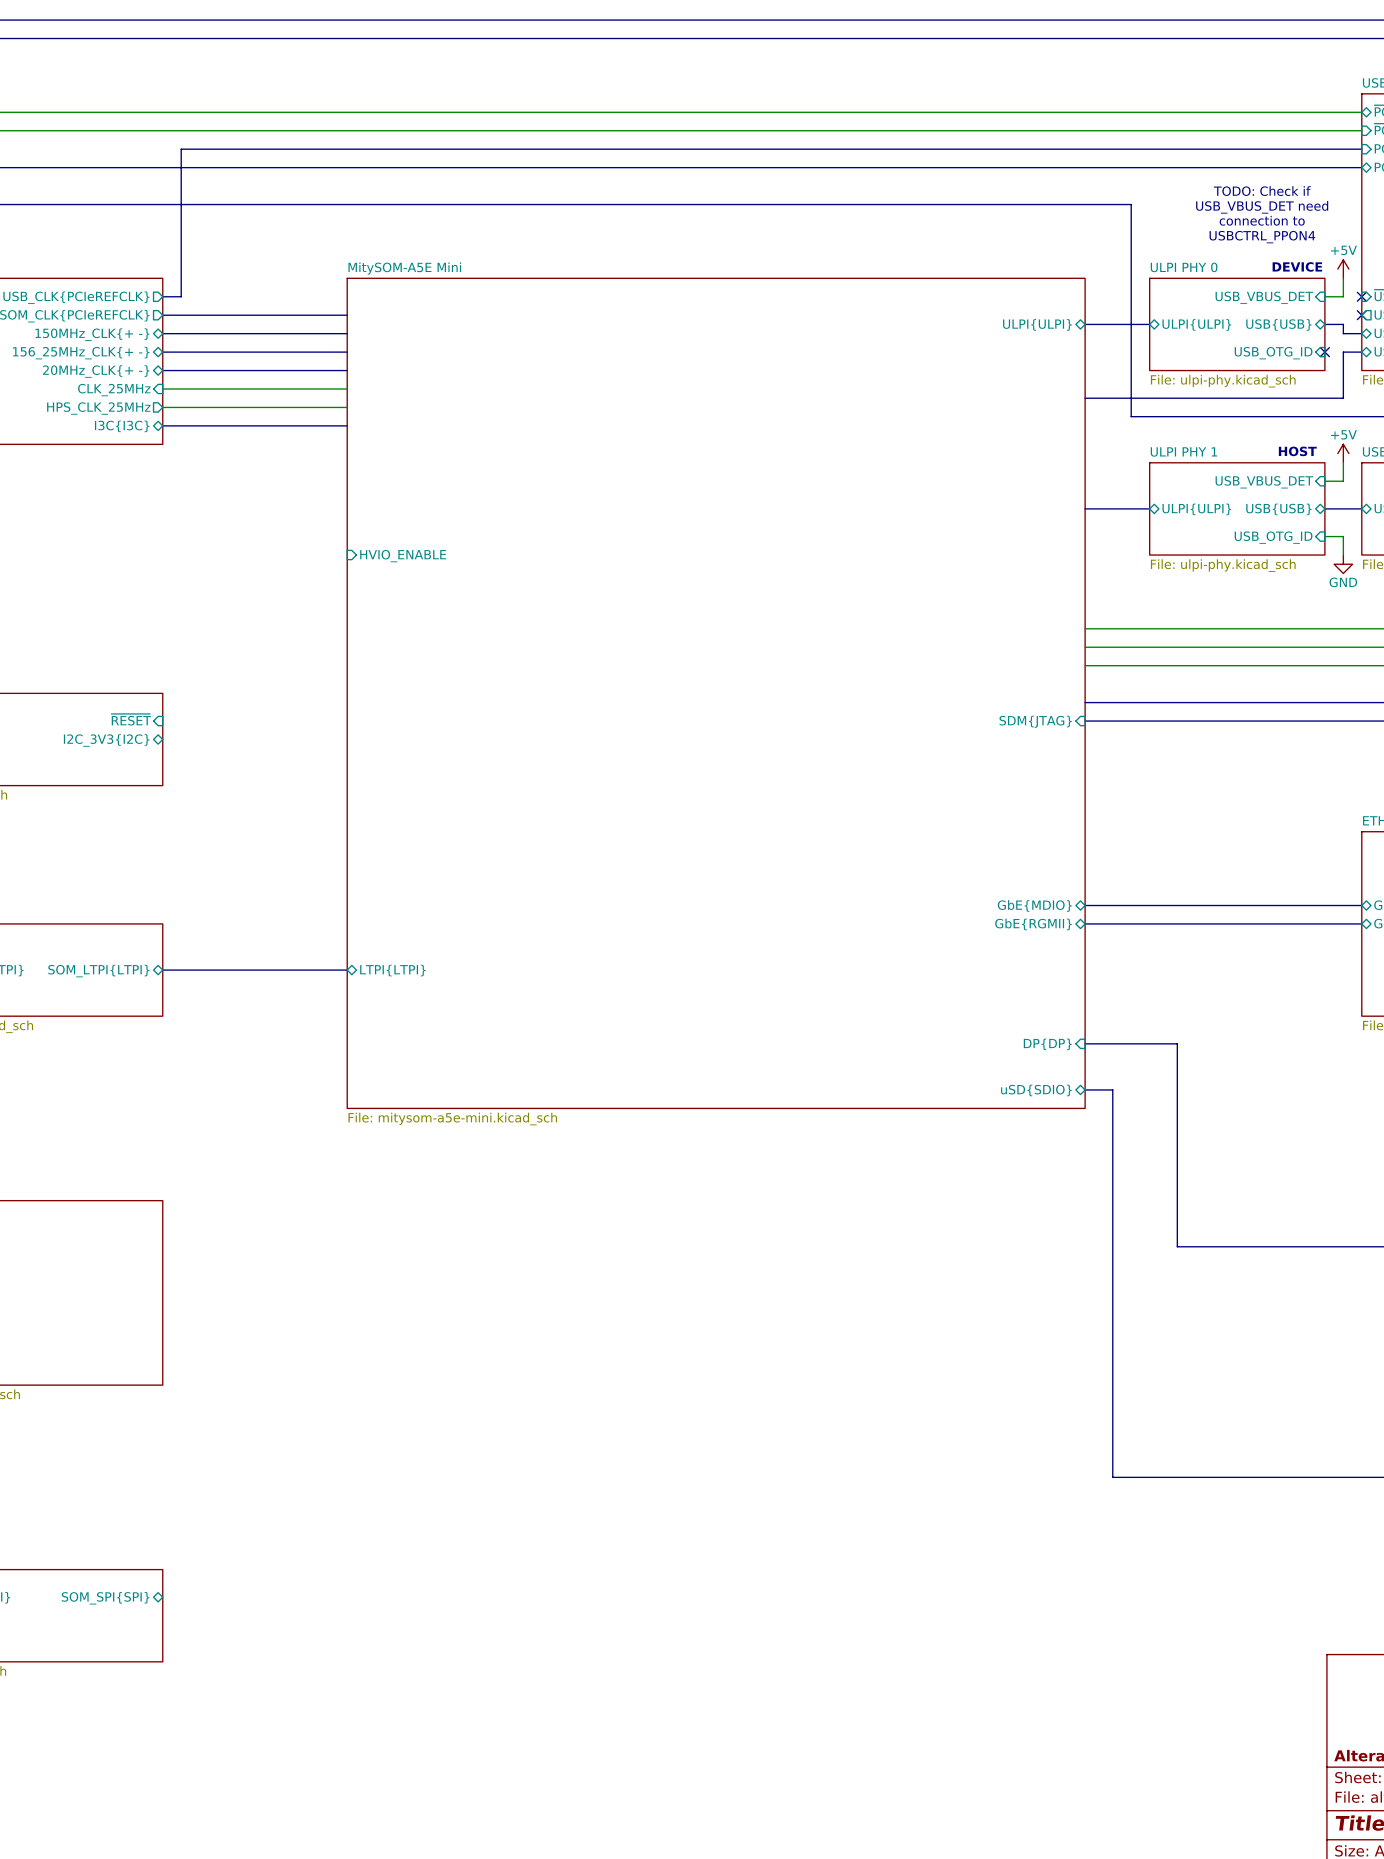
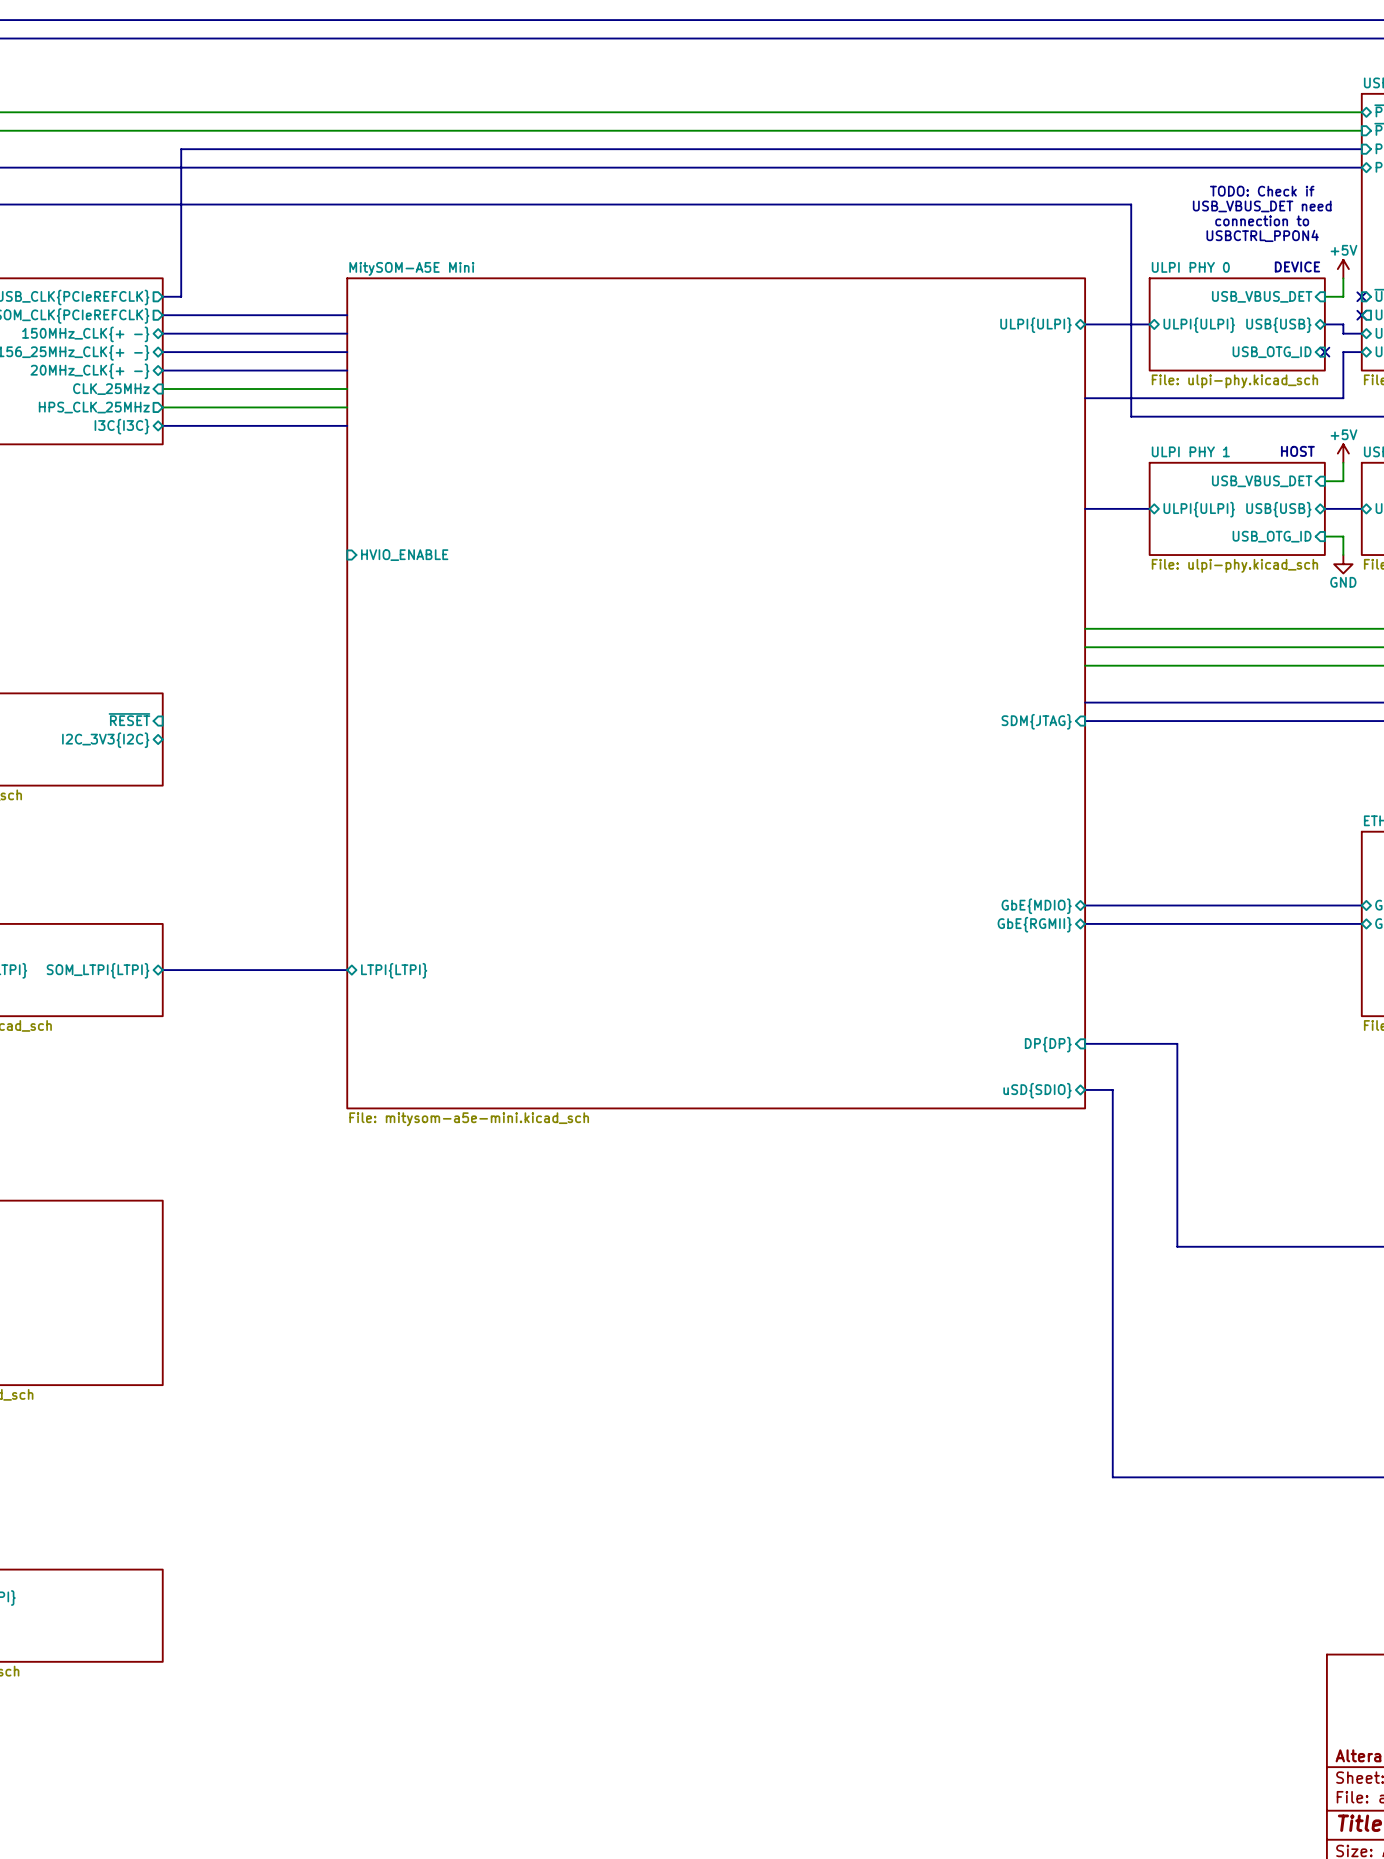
sheet pin: SOM_SPI{SPI} (105, 1598) -> none

